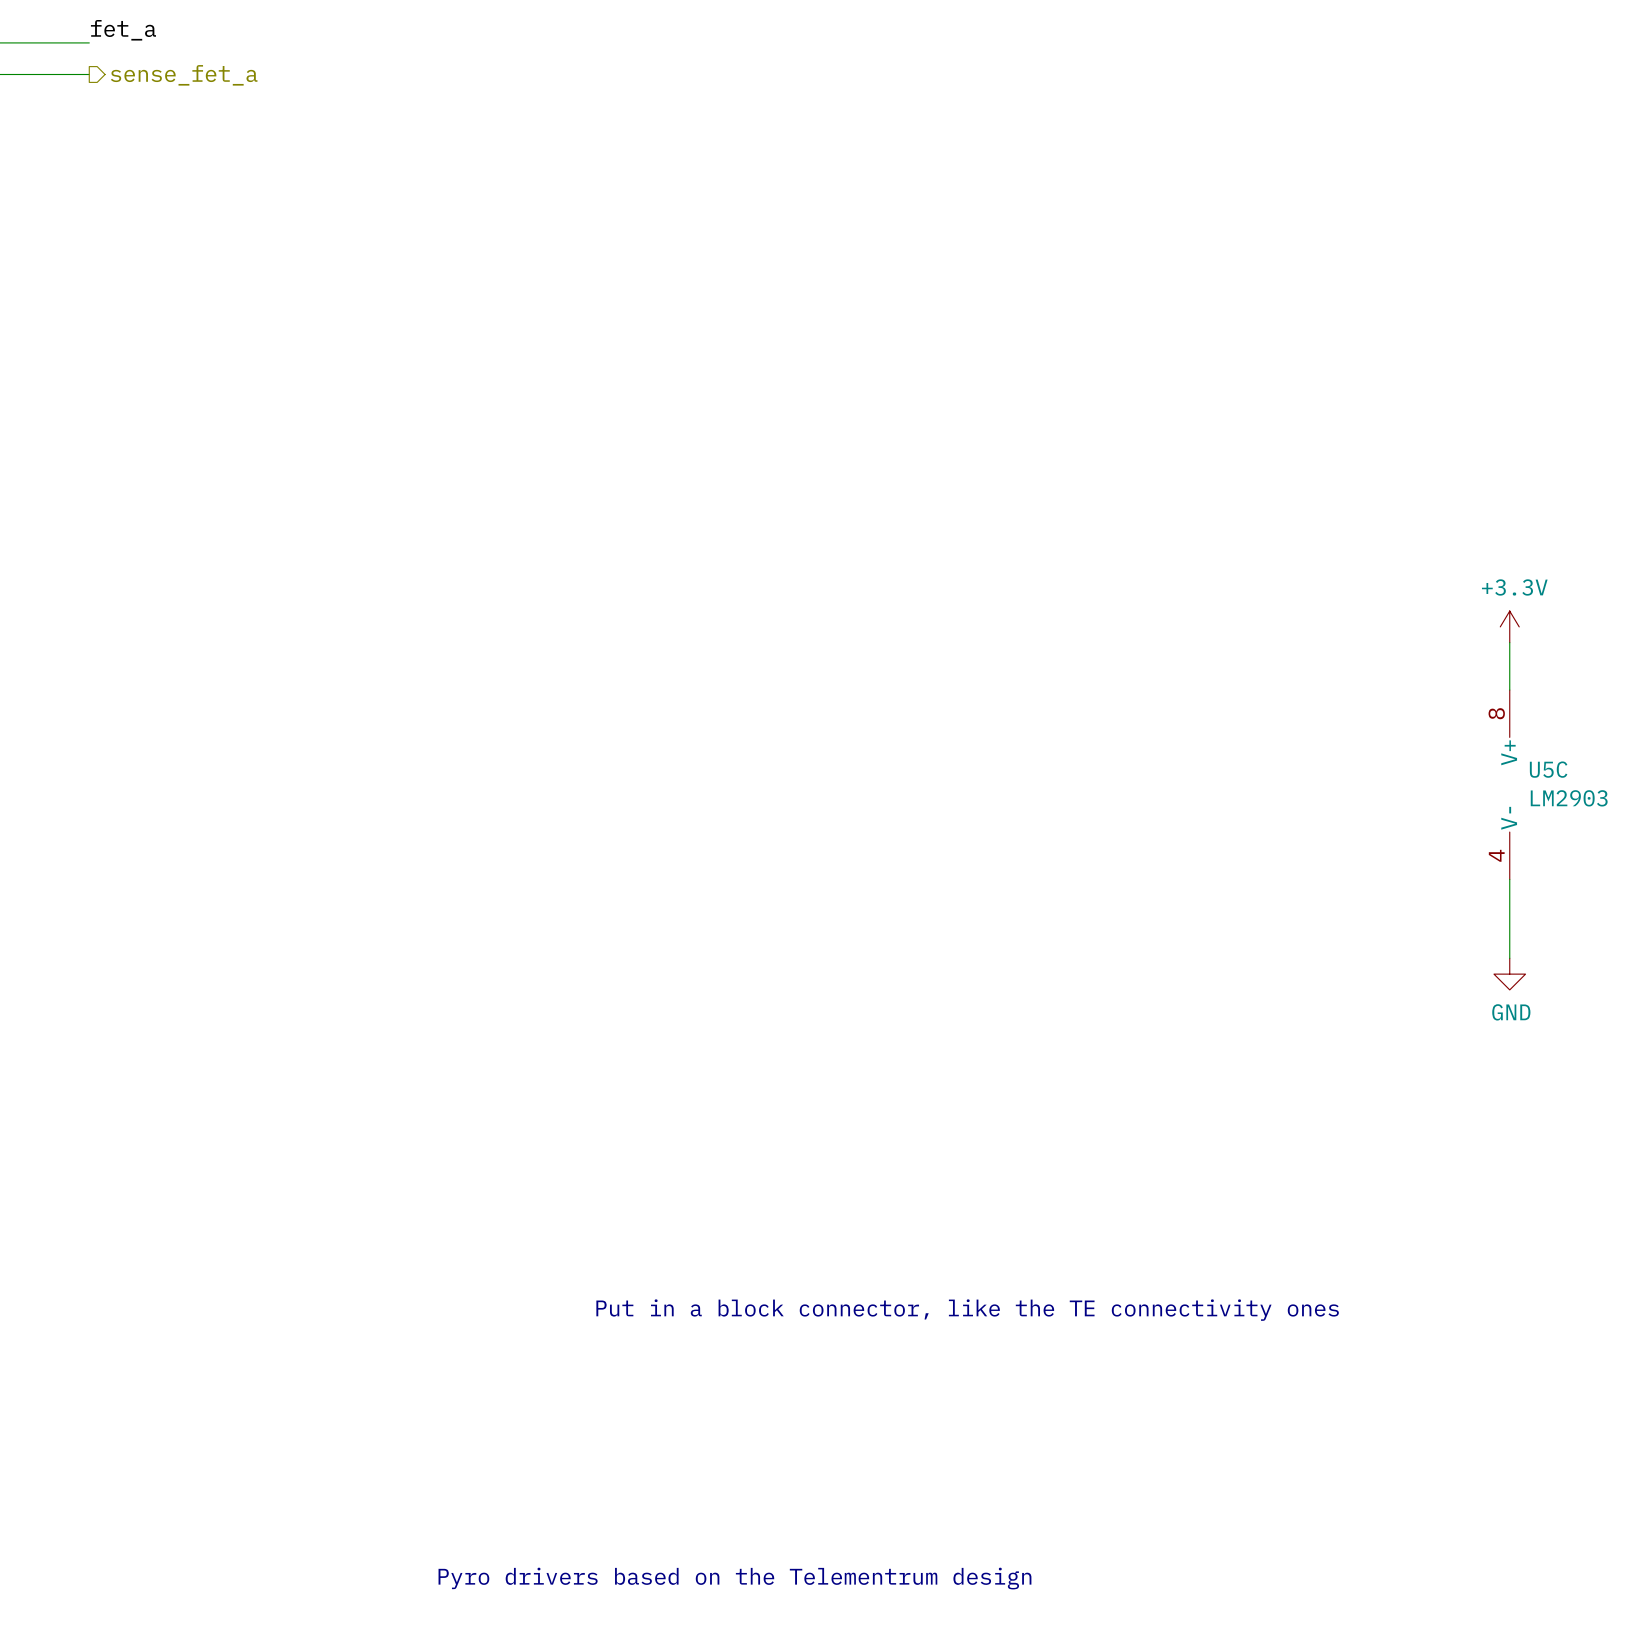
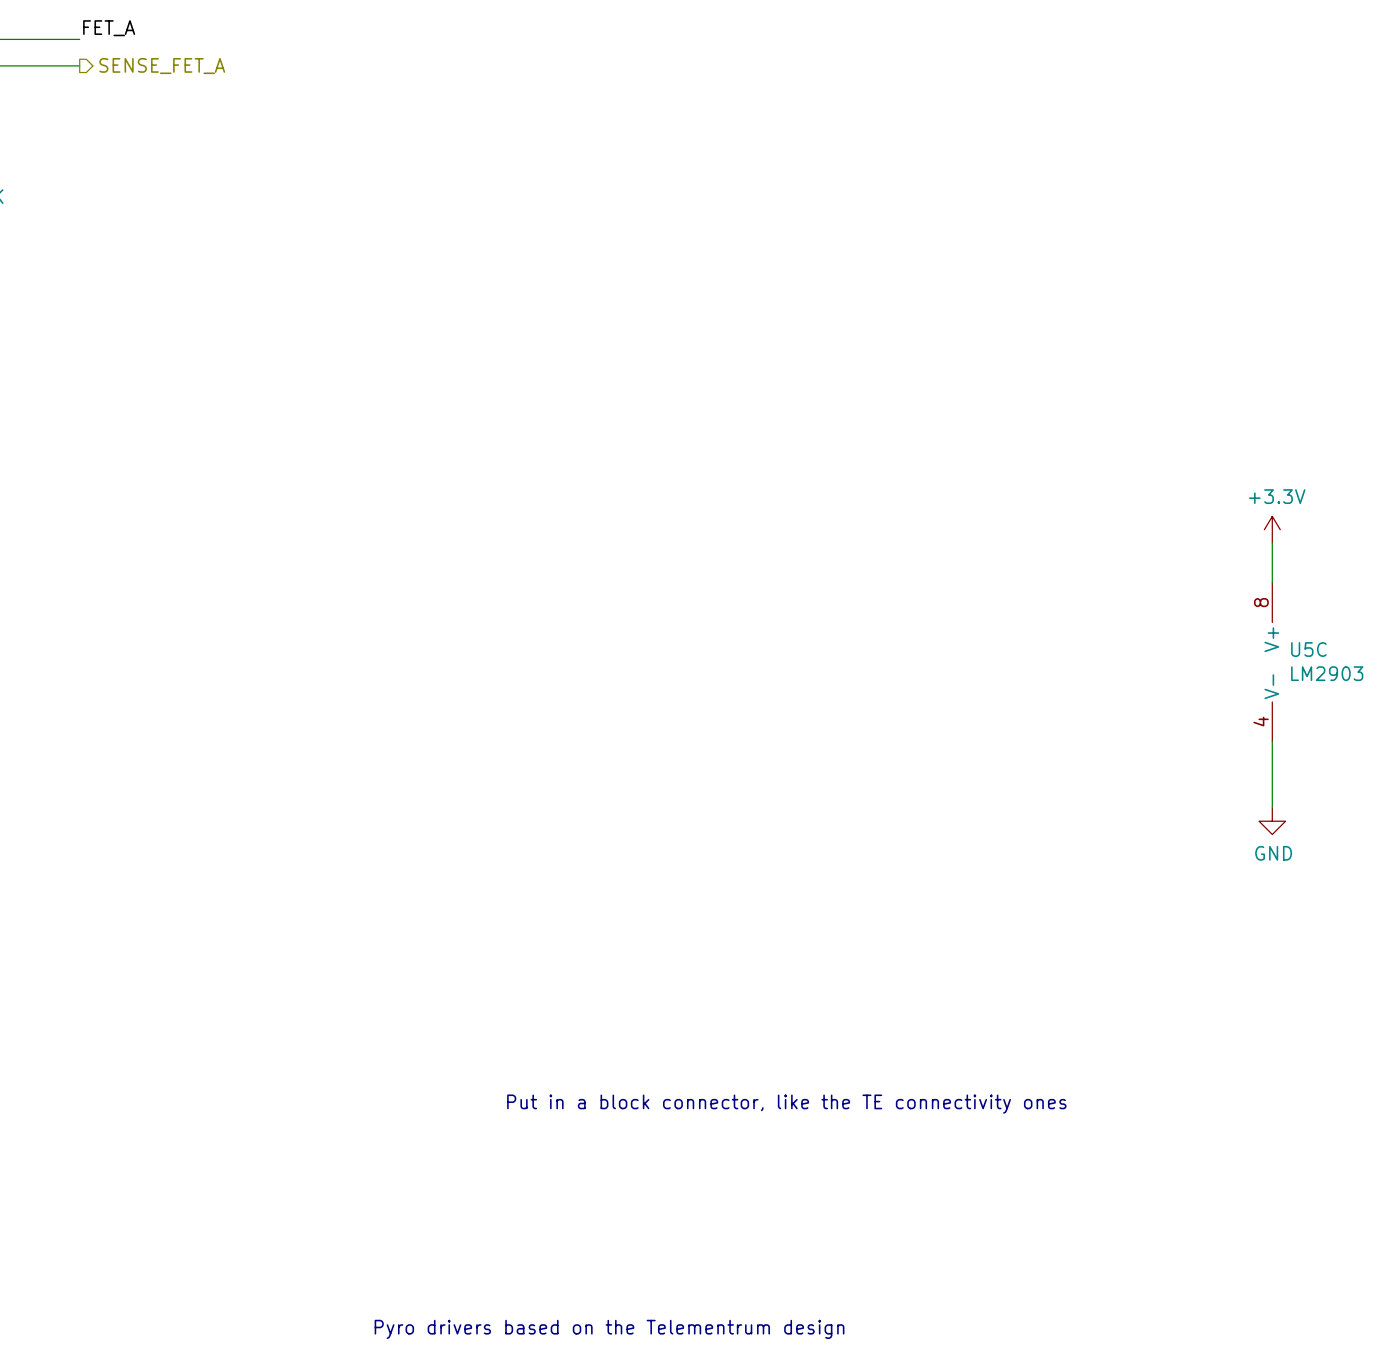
label: fet_a (123, 30) -> FET_A (109, 28)
hierarchical label: sense_fet_a (184, 75) -> SENSE_FET_A (162, 66)

